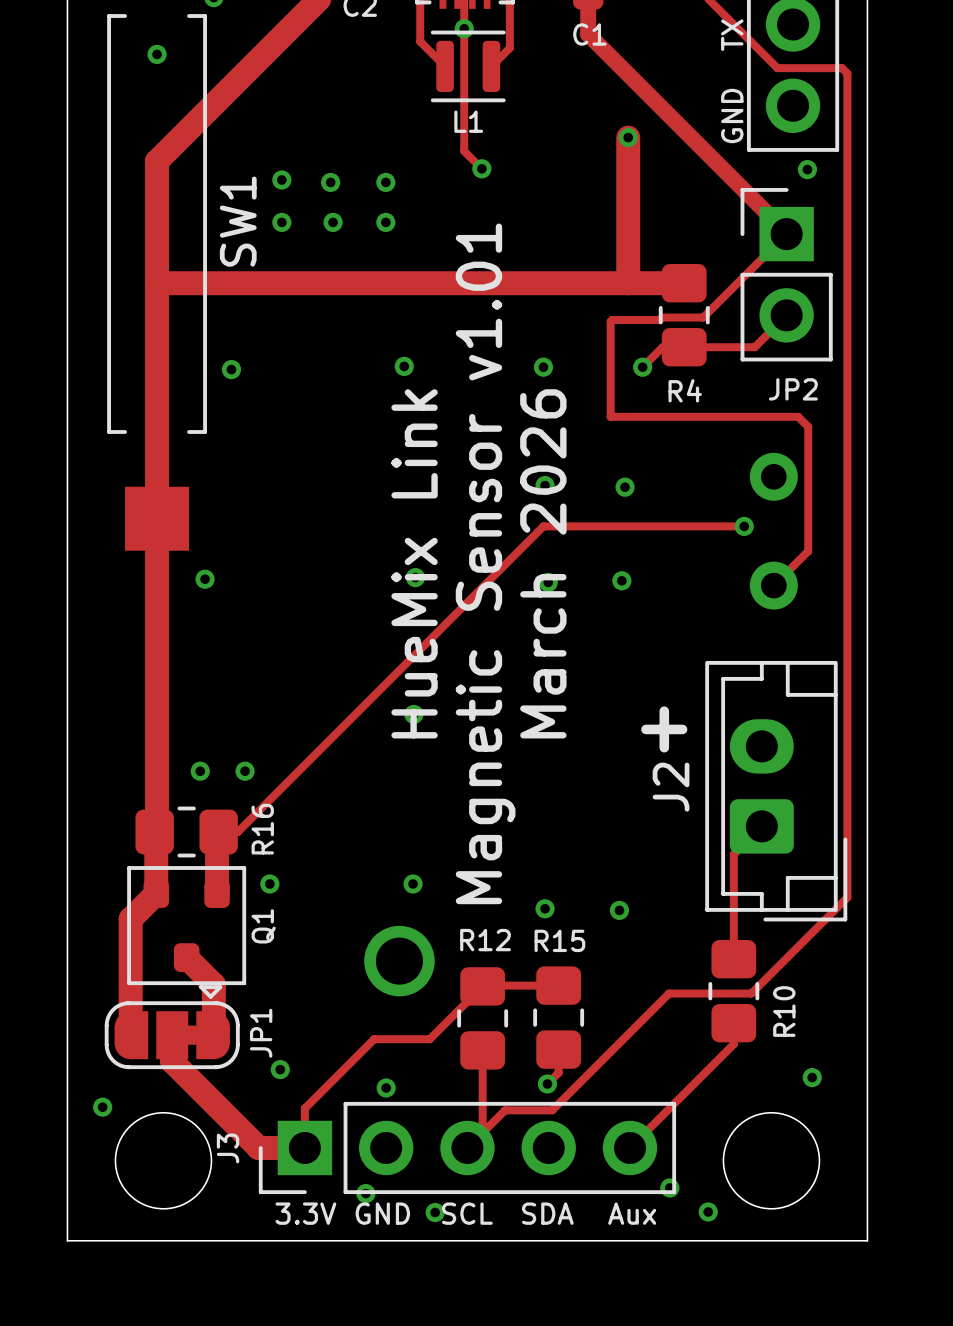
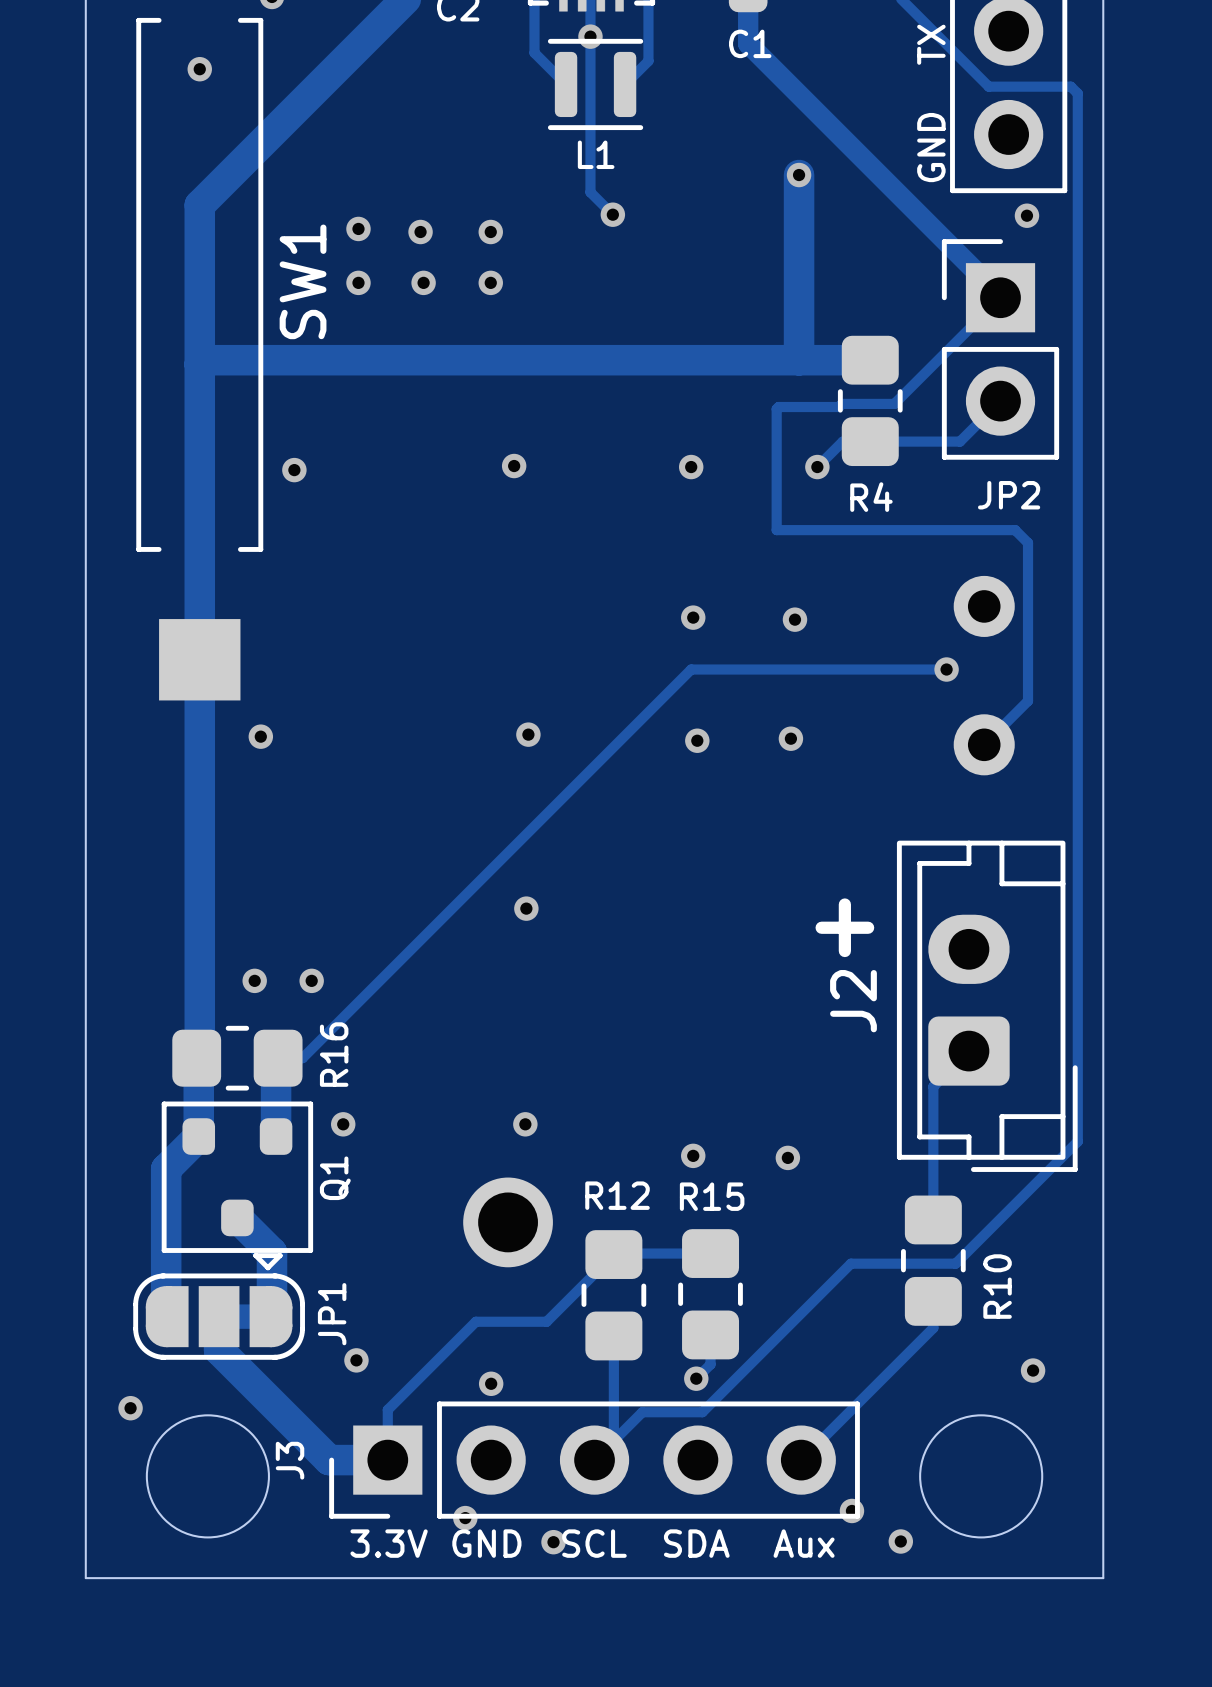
text: HueMix Link (414, 563) -> none
text: Magnetic Sensor v1.01 (485, 563) -> none
text: March 2026 (543, 563) -> none

